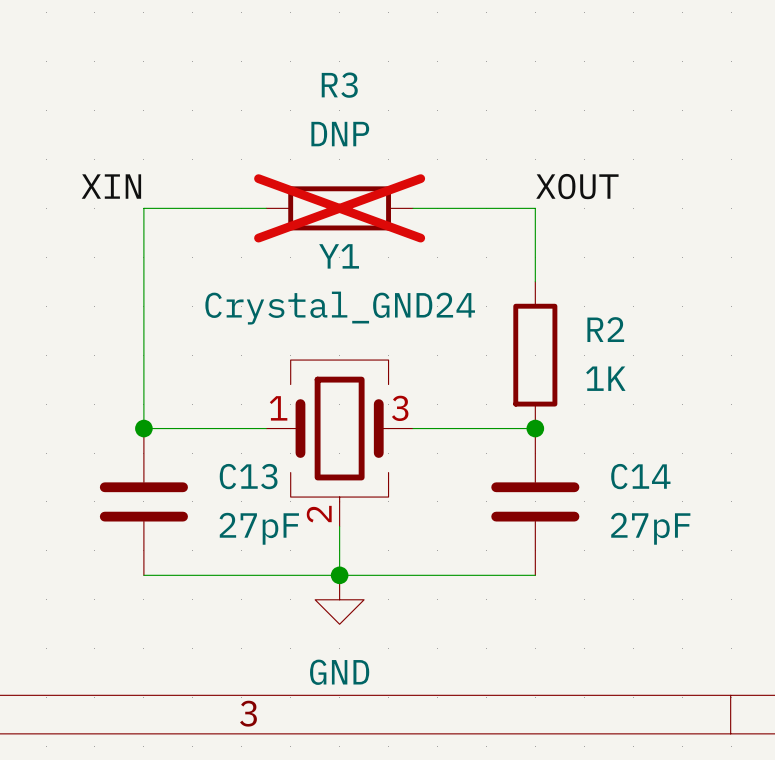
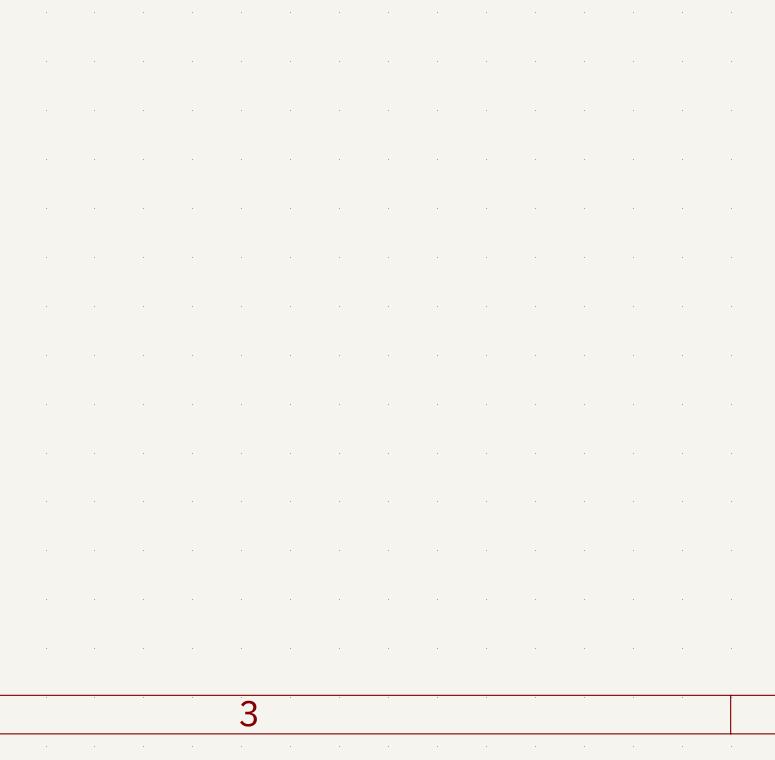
label: XIN (111, 186) -> none
label: XOUT (577, 186) -> none
wire: (266, 208) (143, 208) (143, 428) (266, 428) -> none
R3: DNP (339, 208) -> none
wire: (413, 208) (535, 208) (535, 281) -> none
R2: 1K (535, 355) -> none
junction: (143, 428) -> none
wire: (413, 428) (535, 428) -> none
junction: (535, 428) -> none
Y1: Crystal_GND24 (339, 443) -> none
C13: 27pF (143, 501) -> none
C14: 27pF (535, 501) -> none
wire: (339, 526) (339, 575) -> none
wire: (143, 575) (535, 575) -> none
junction: (339, 575) -> none
power symbol: GND (339, 599) -> none

